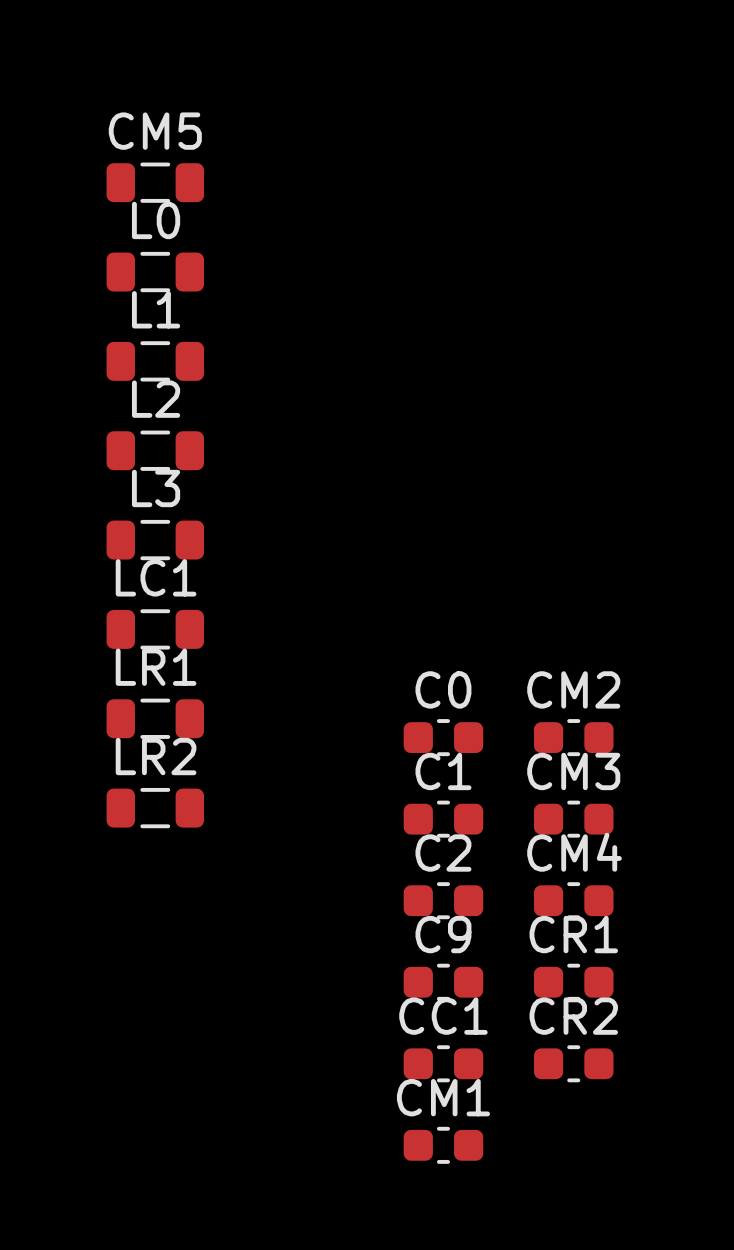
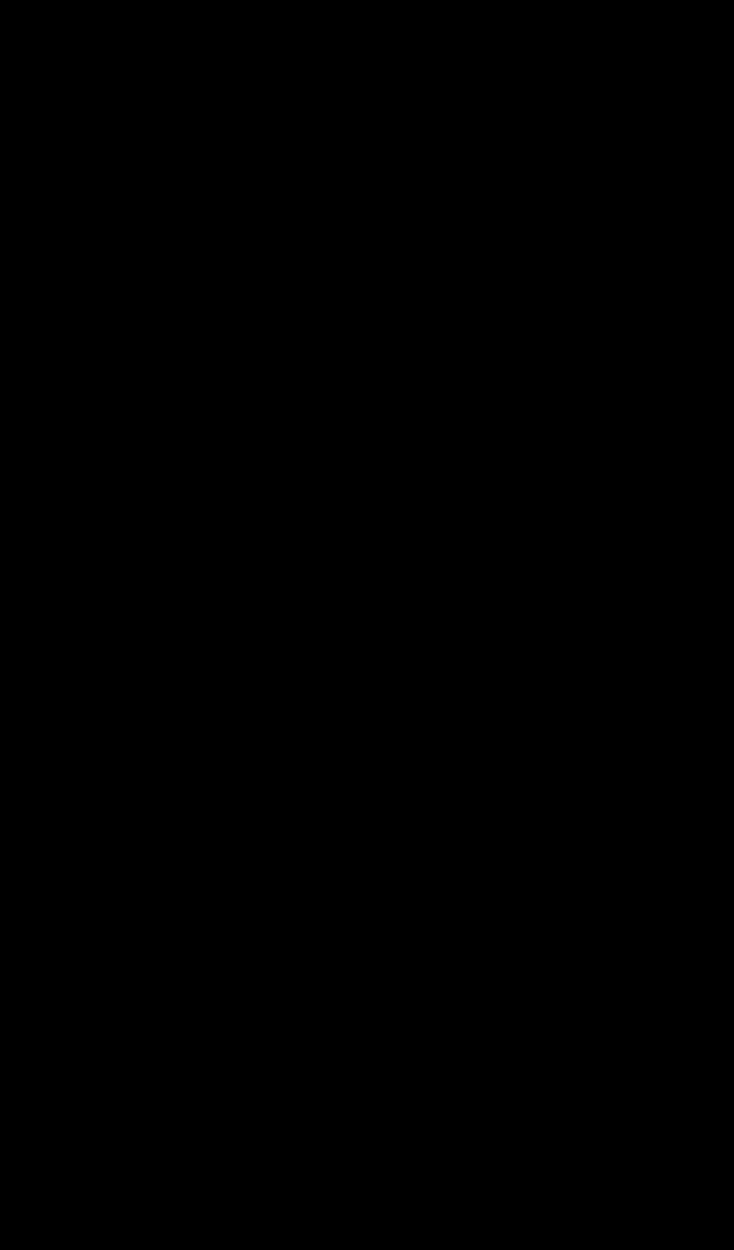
CM5: (155, 182) -> none
L0: (155, 272) -> none
L1: (155, 361) -> none
L2: (155, 450) -> none
L3: (155, 540) -> none
LC1: (155, 629) -> none
LR1: (155, 718) -> none
C0: (443, 737) -> none
CM2: (573, 737) -> none
LR2: (155, 808) -> none
C1: (443, 819) -> none
CM3: (573, 819) -> none
C2: (443, 900) -> none
CM4: (573, 900) -> none
C9: (443, 982) -> none
CR1: (573, 982) -> none
CC1: (443, 1063) -> none
CR2: (573, 1063) -> none
CM1: (443, 1145) -> none

